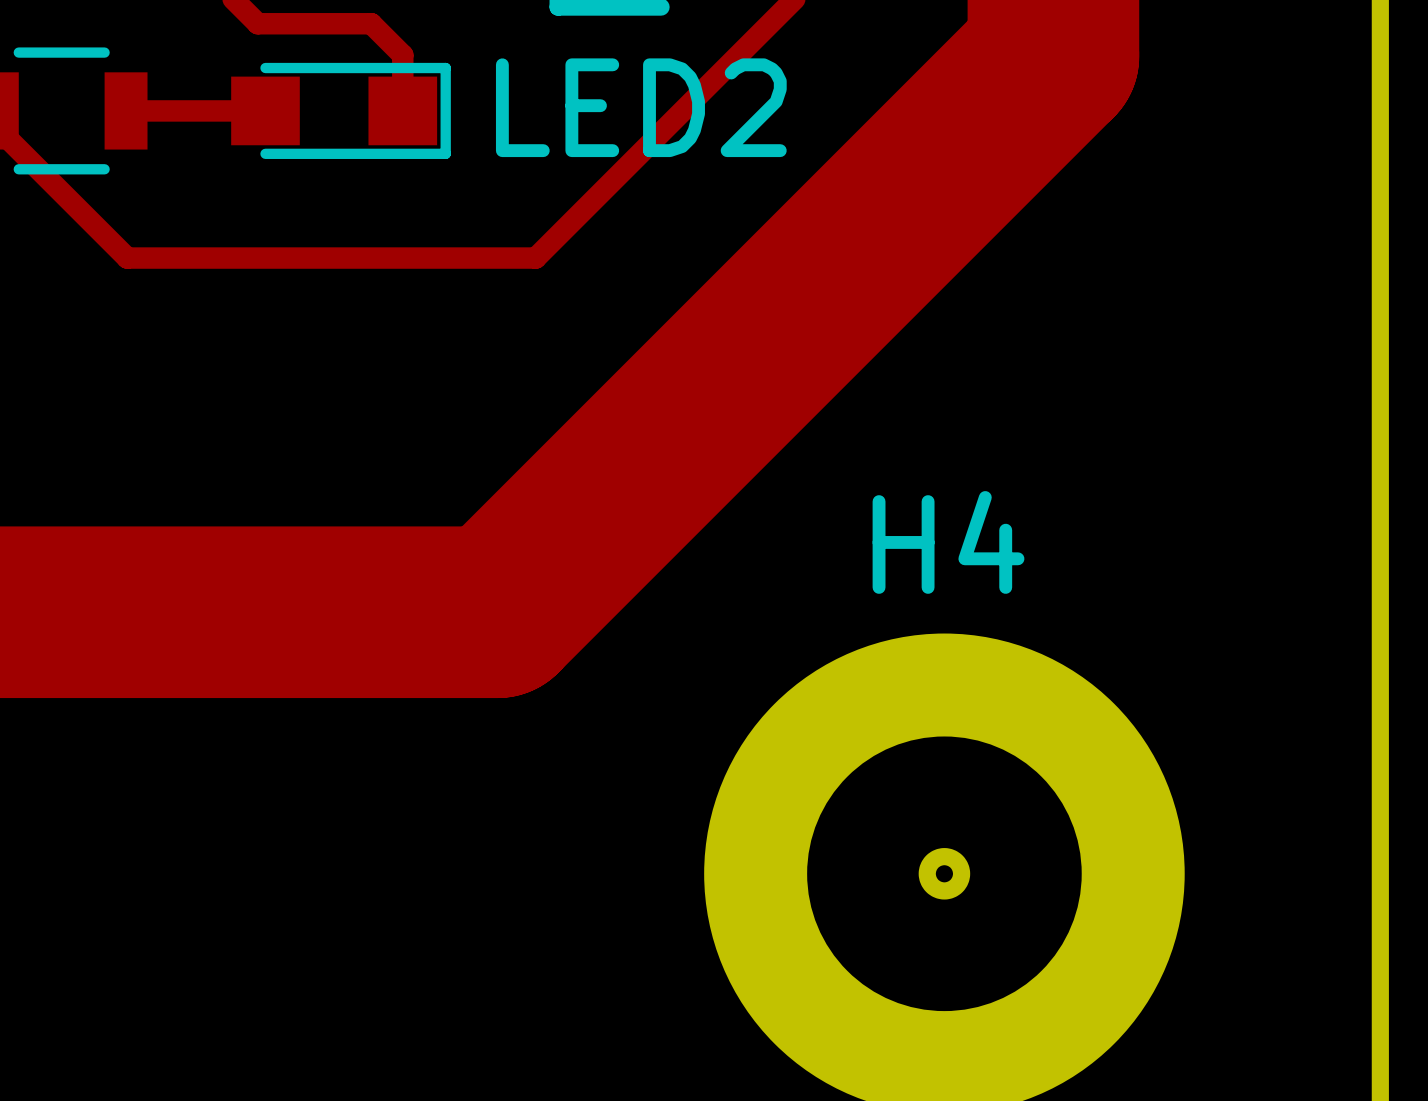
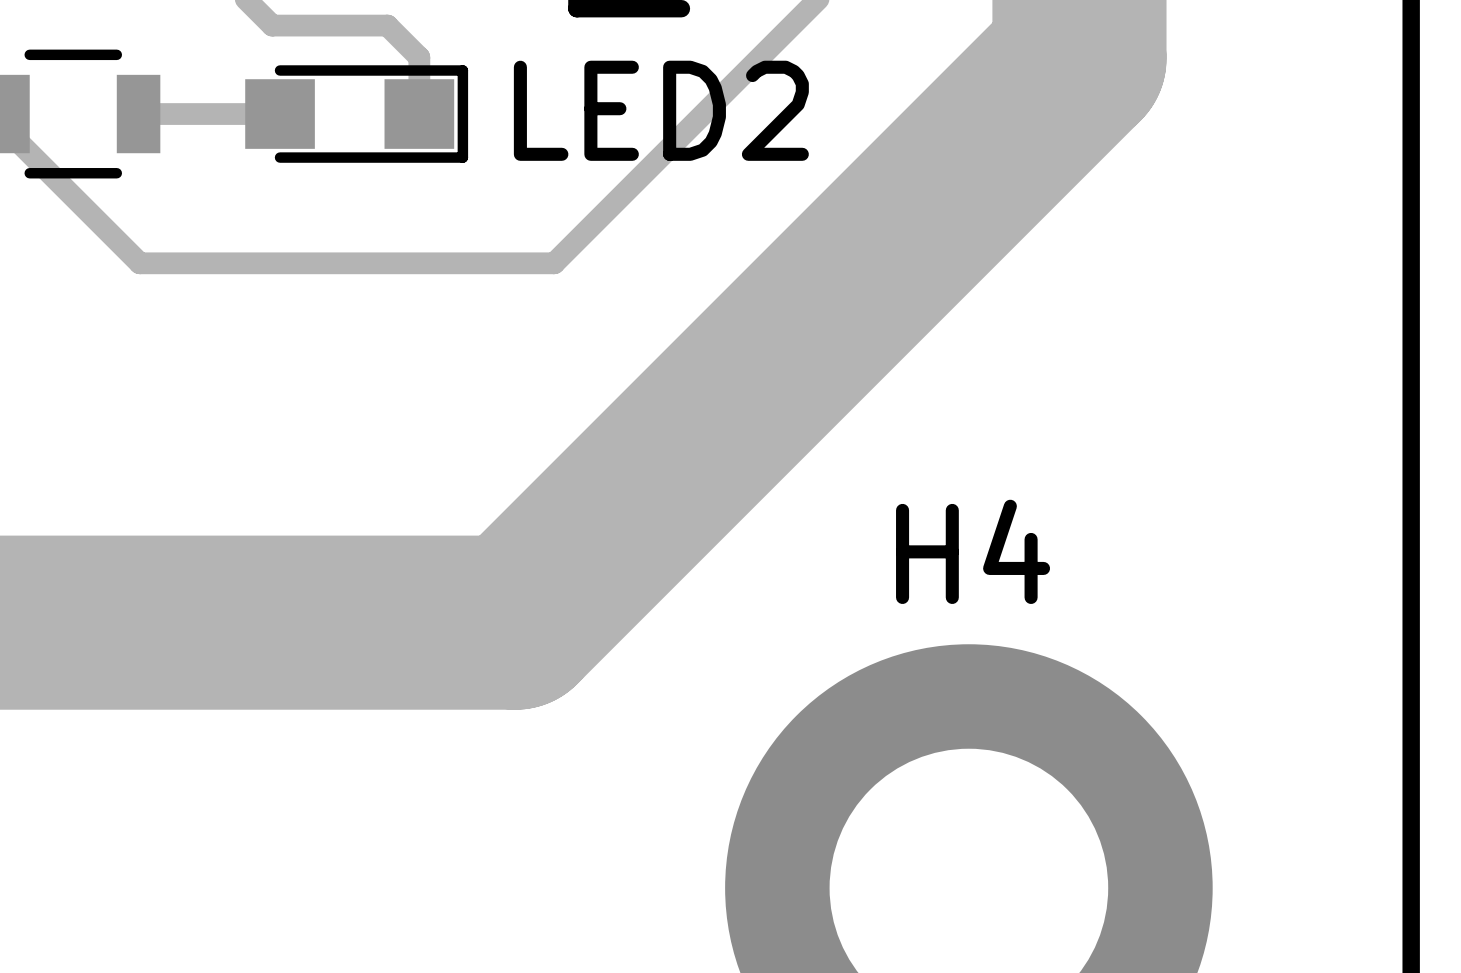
round board edge: [918, 848, 971, 900] -> none

